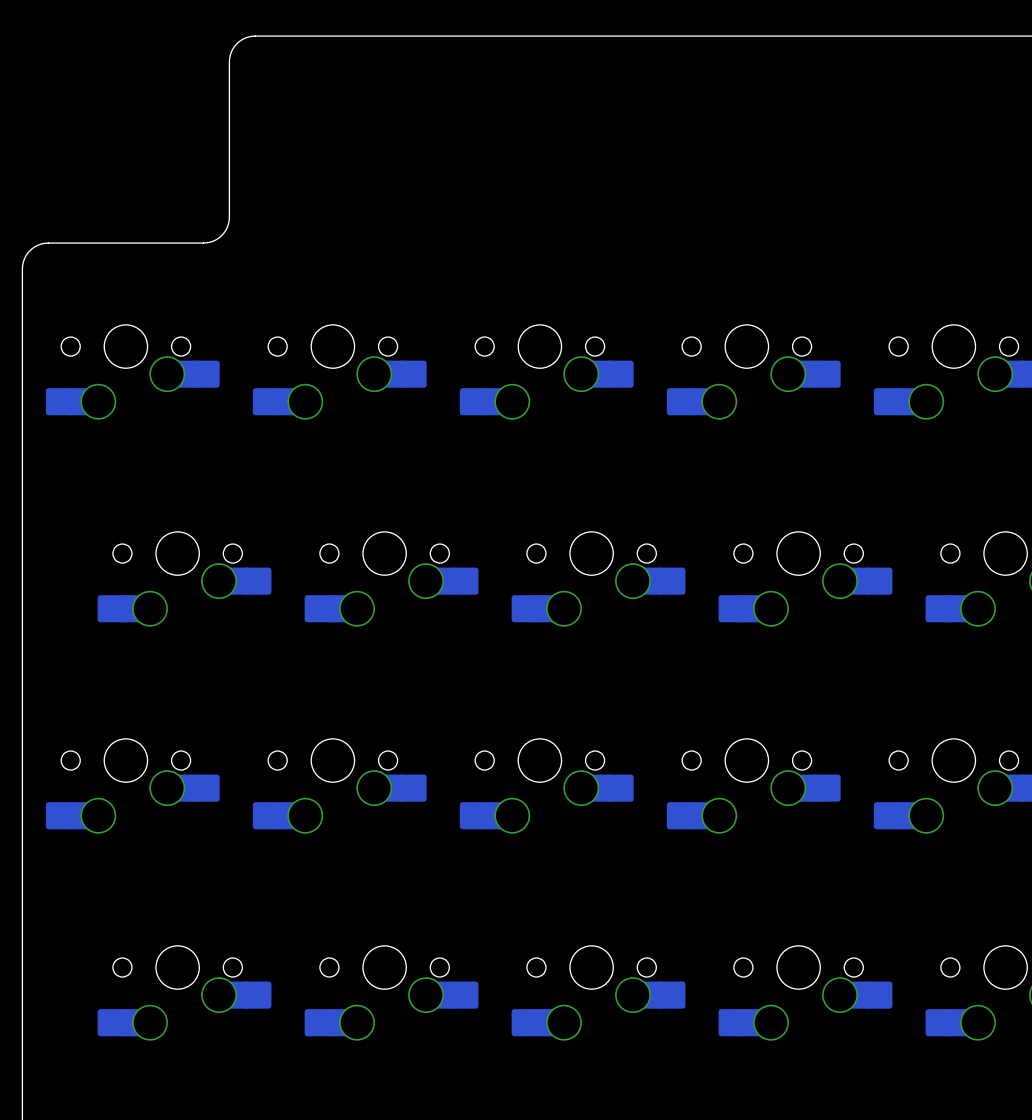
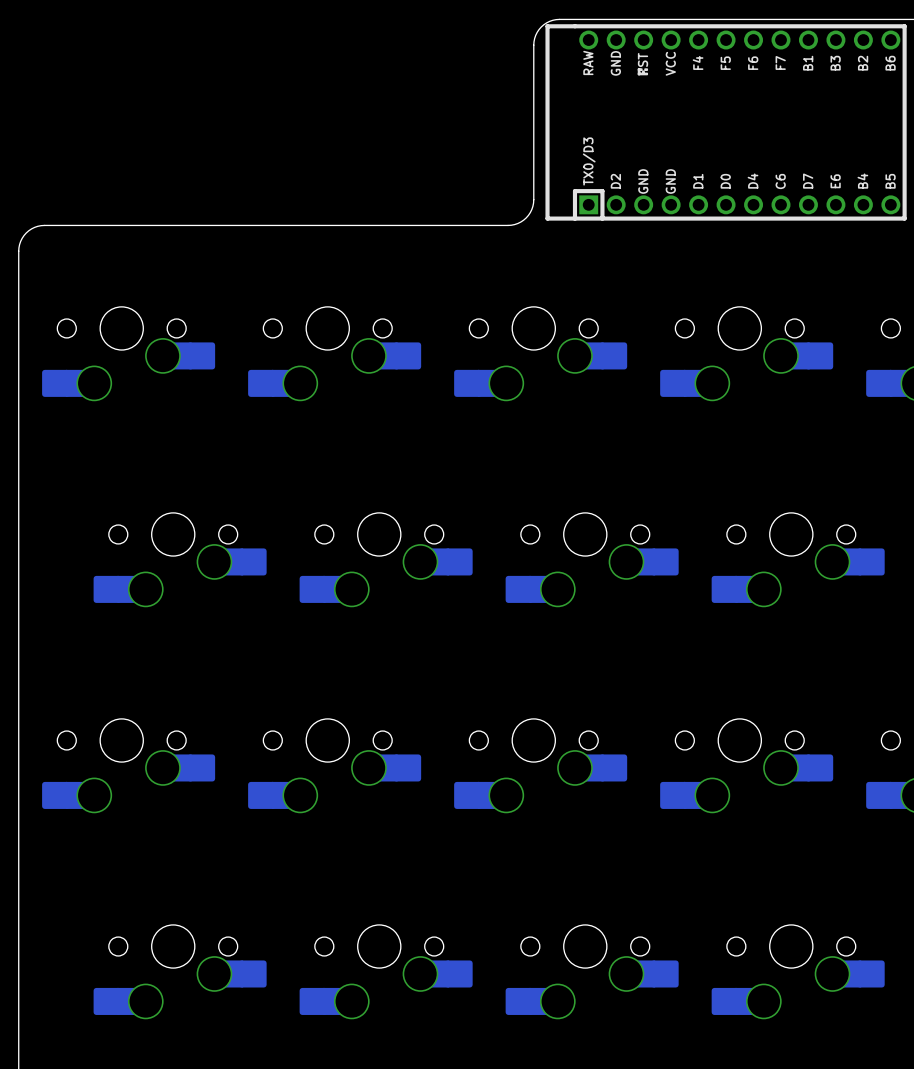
board edge: (565, 36) (255, 36) (242, 39) (232, 49) (229, 58) (229, 220) (225, 230) (219, 237) (203, 243) -> (559, 19) (543, 24) (537, 32) (534, 41) (533, 203) (528, 215) (520, 221) (508, 225) (199, 225)
part: none -> (726, 122)

